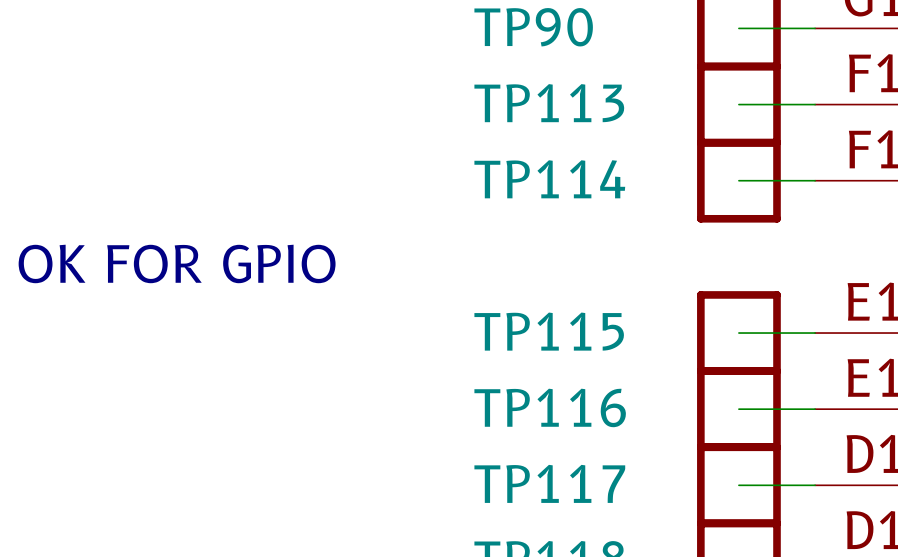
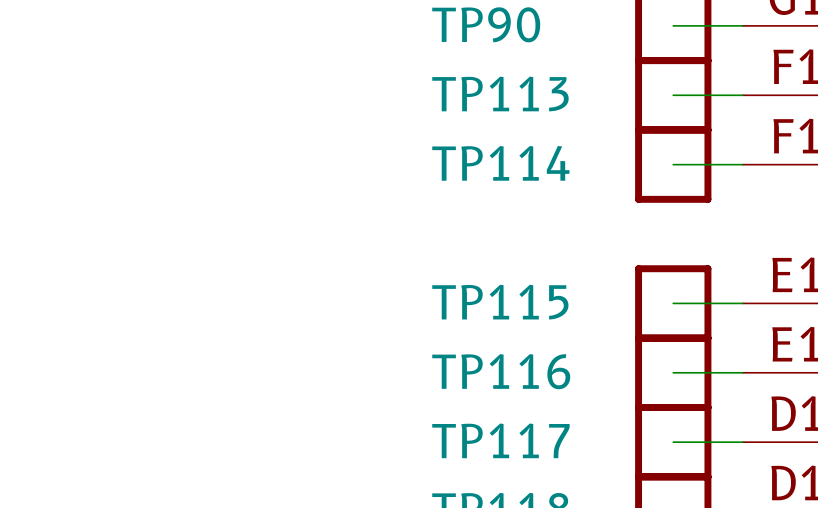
text: OK FOR GPIO (177, 263) -> none

